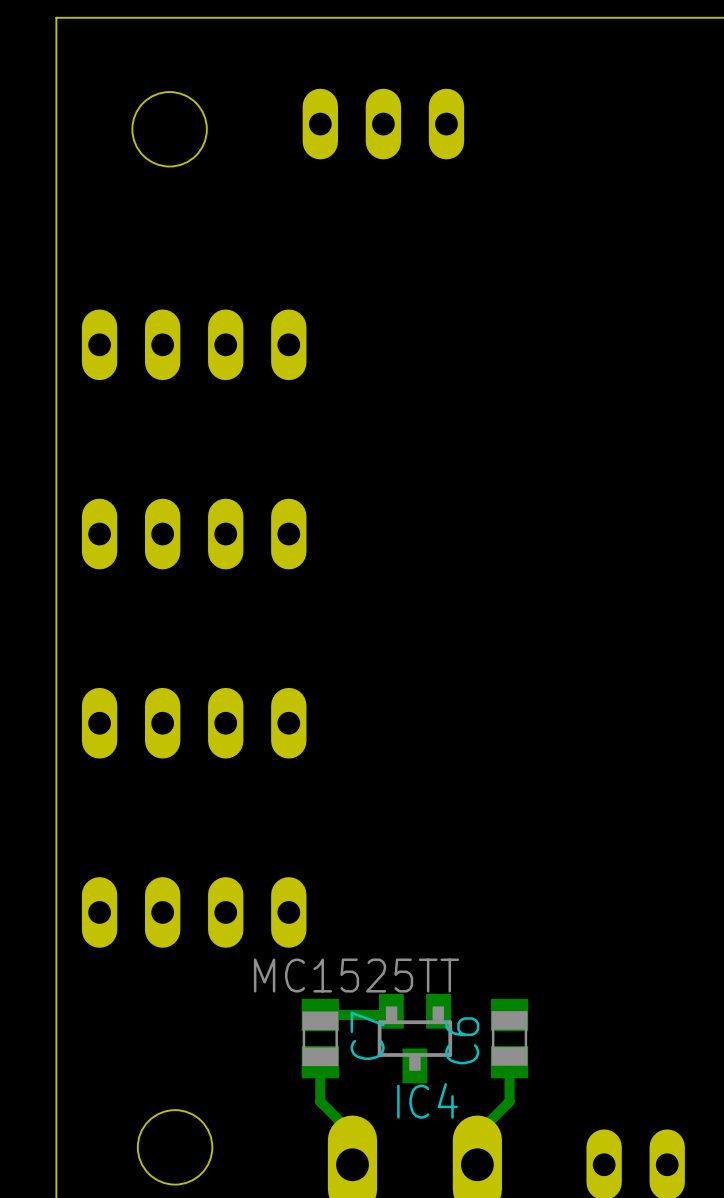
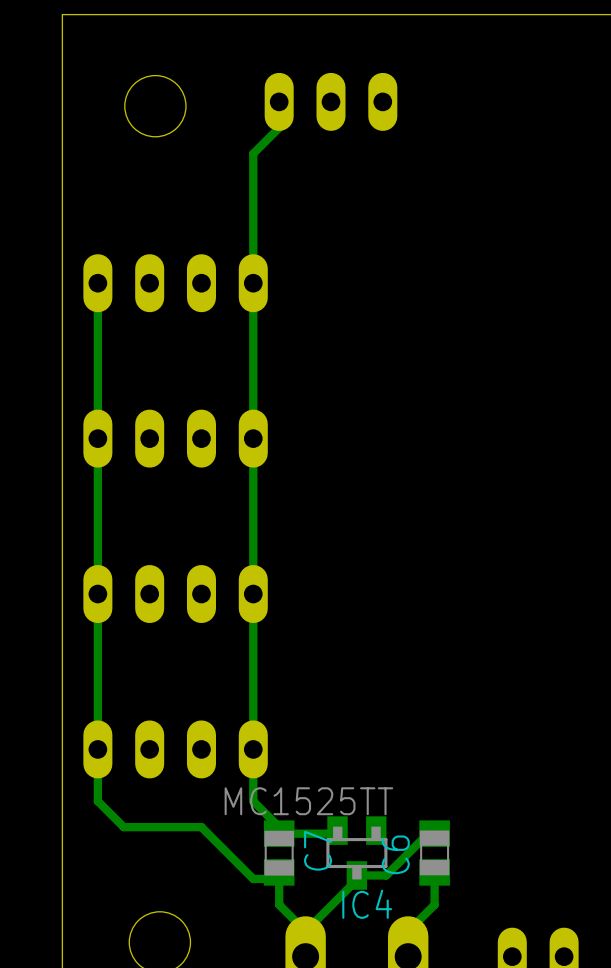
track: none -> (279, 101) (279, 127) (253, 153) (253, 801) (279, 827) (279, 833)
track: none -> (97, 283) (97, 801) (123, 827) (201, 827) (253, 878) (272, 878) (279, 872)
track: none -> (434, 833) (428, 833) (386, 875) (356, 875) (356, 879) (305, 931)

